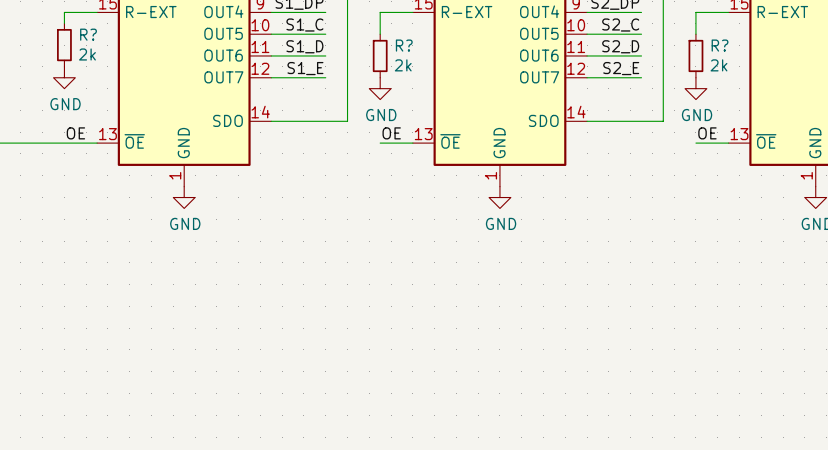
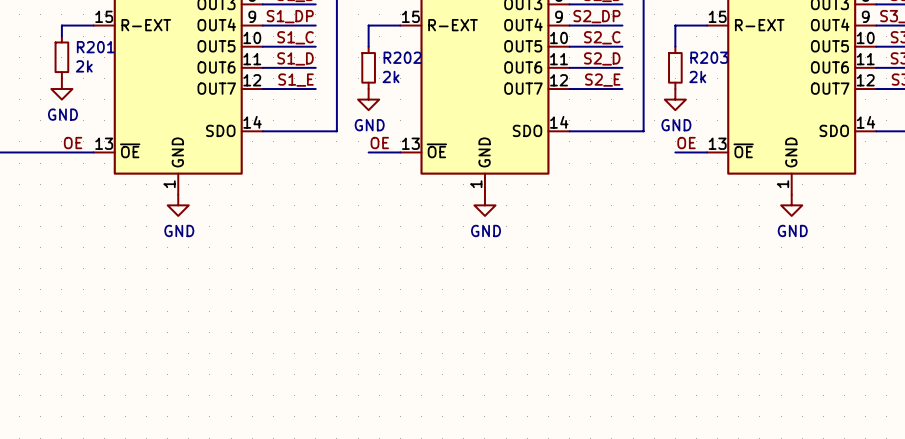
R? name: R? (88, 34) -> R201 (95, 47)
R? name: R? (404, 45) -> R202 (402, 57)
R? name: R? (720, 45) -> R203 (709, 57)

